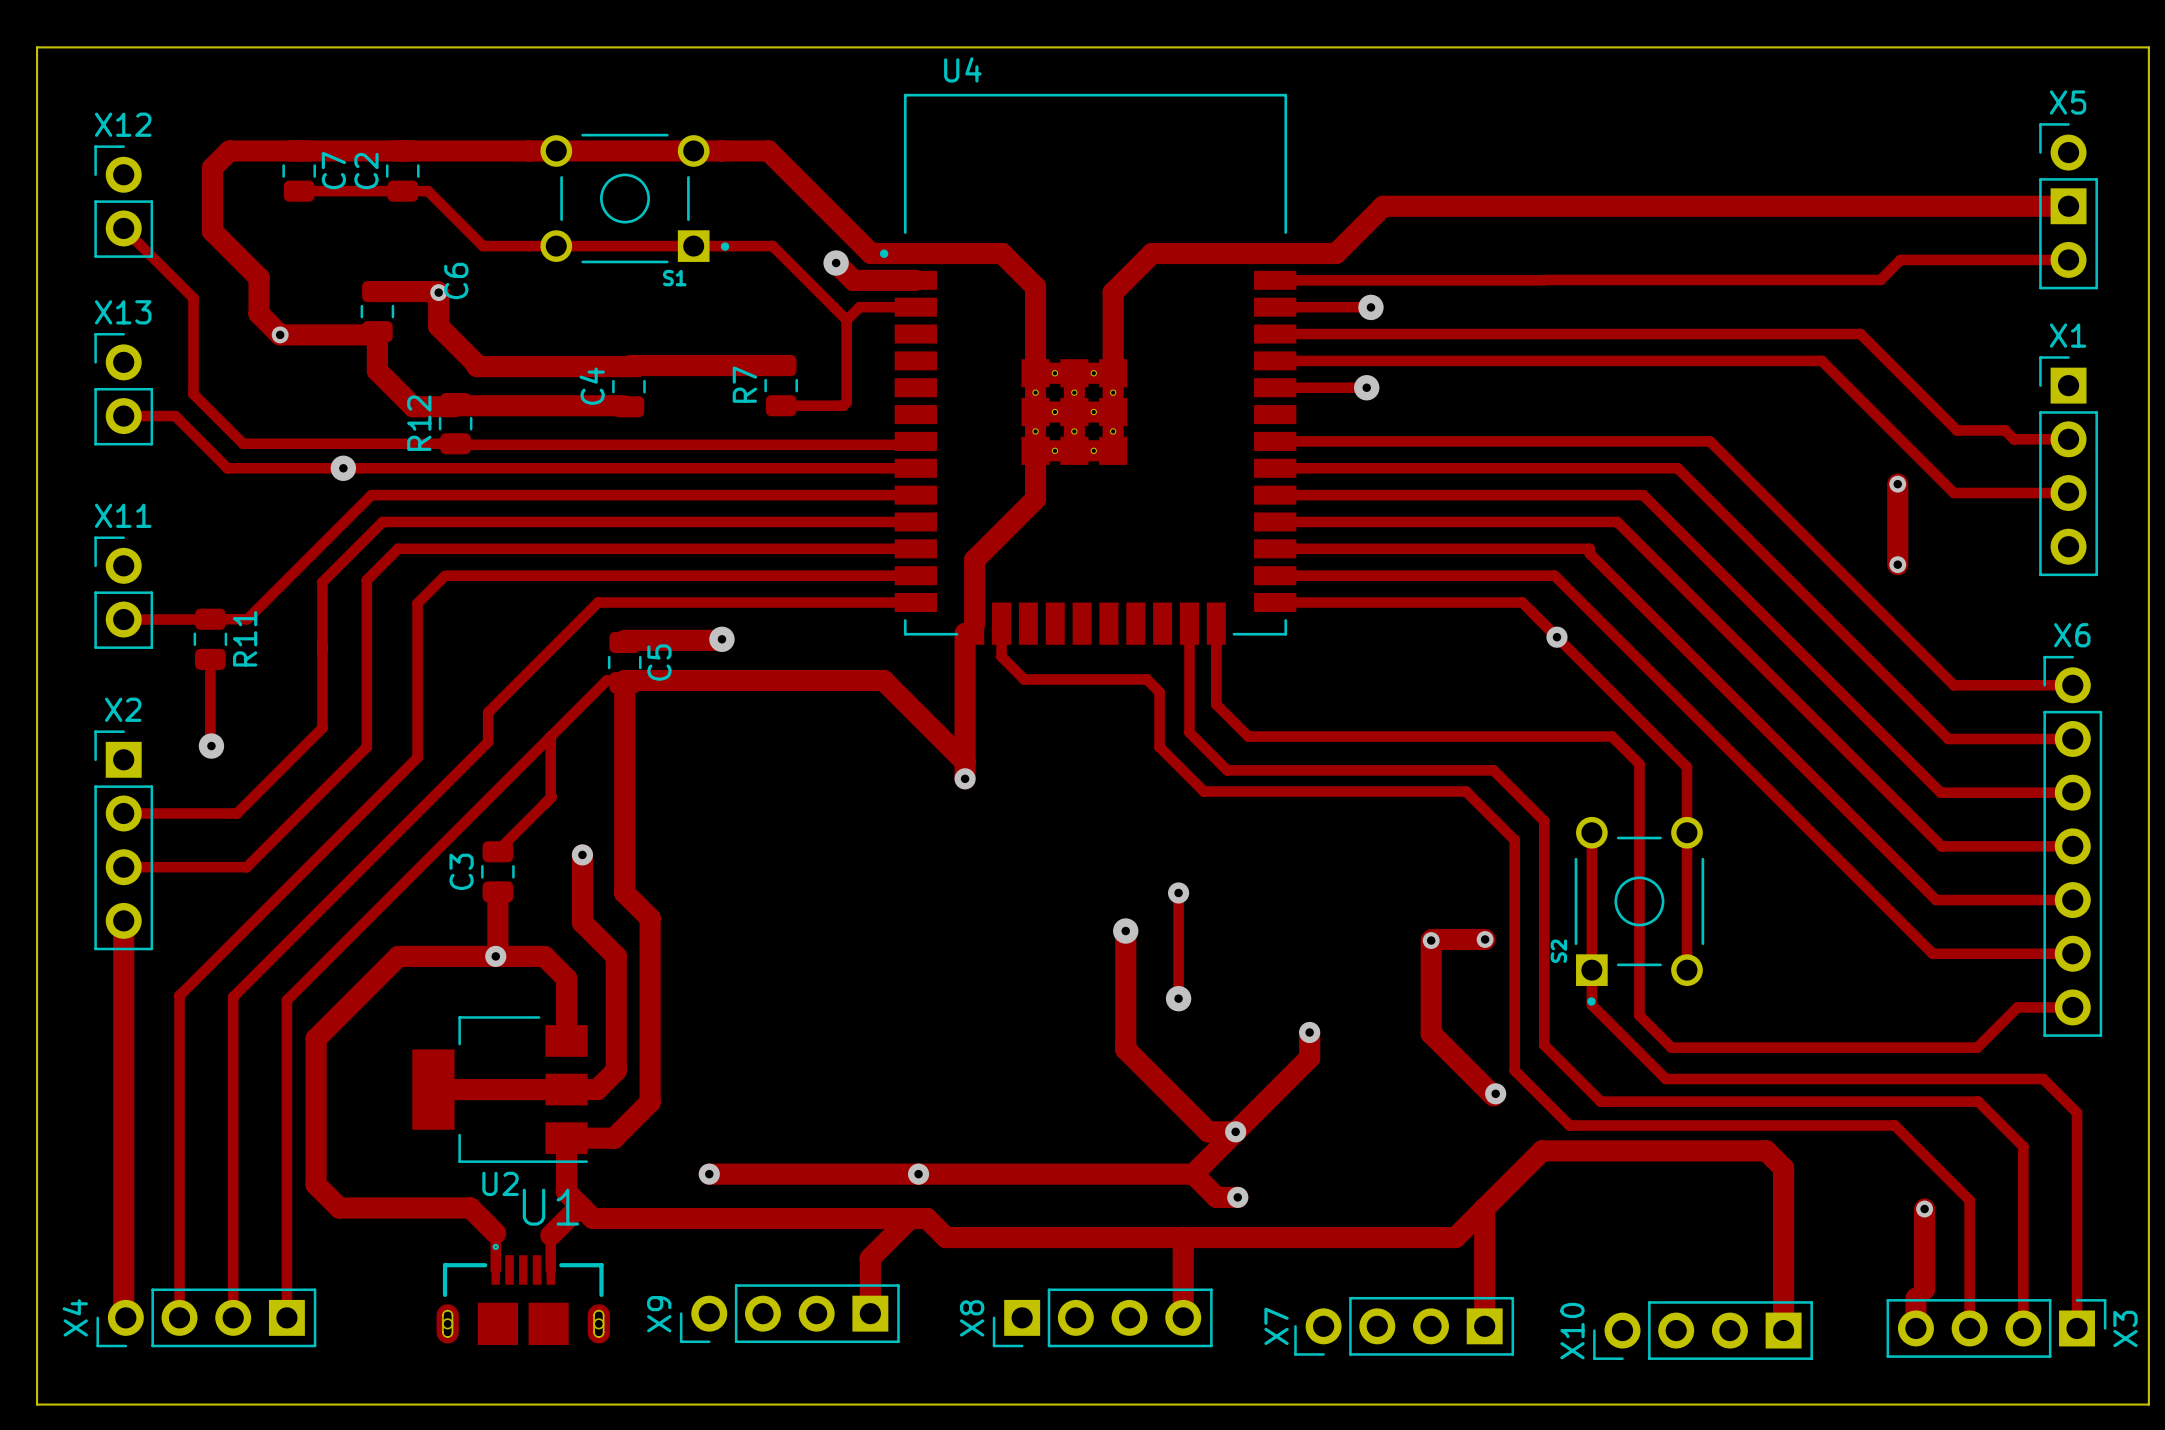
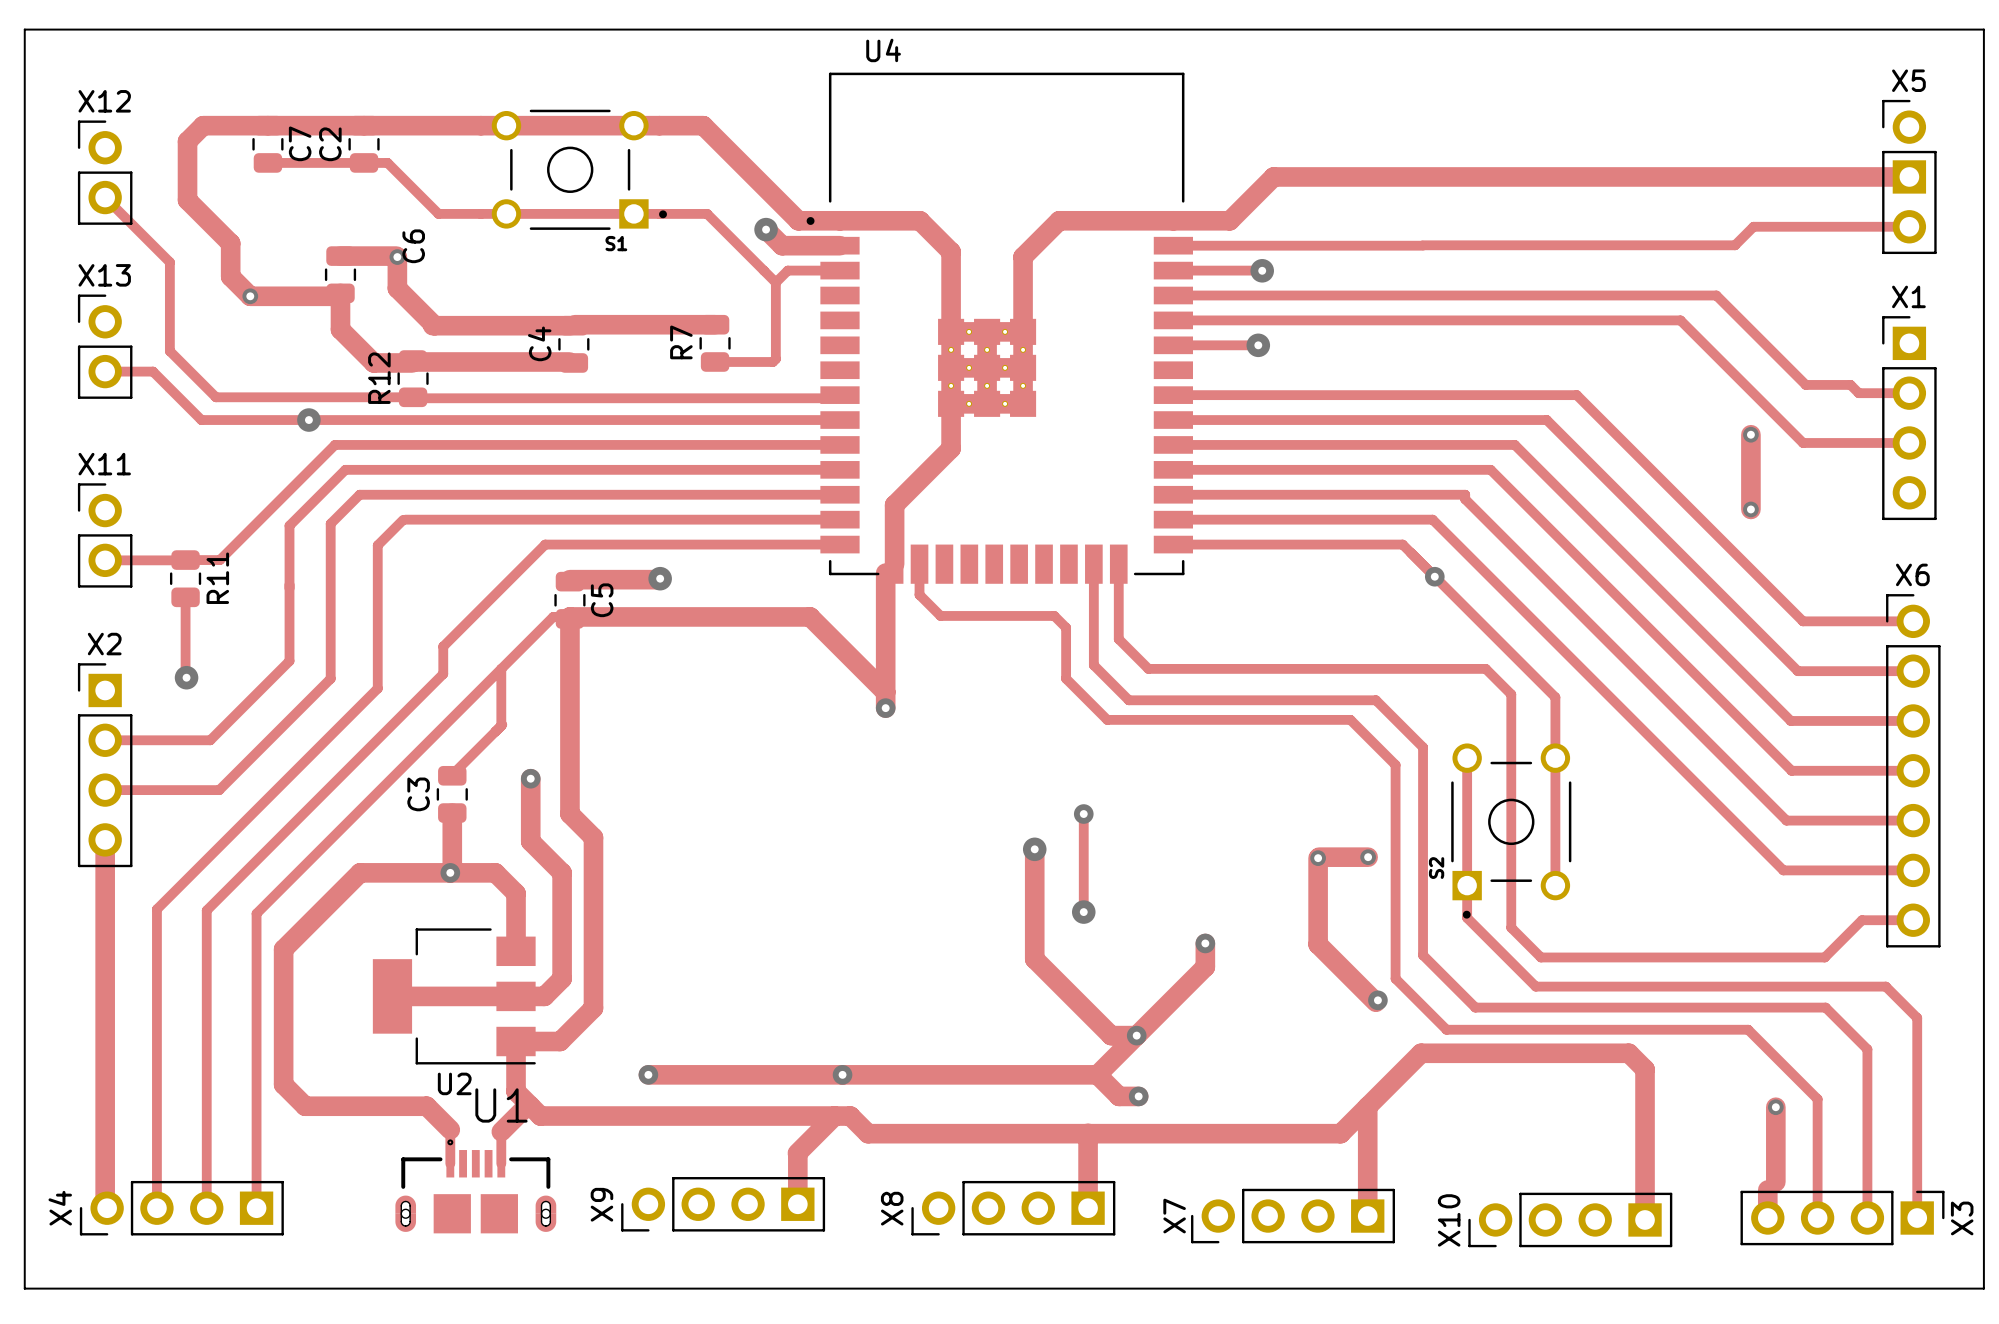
X8 footprint: [992, 1288, 1213, 1348] -> [911, 1180, 1116, 1236]

